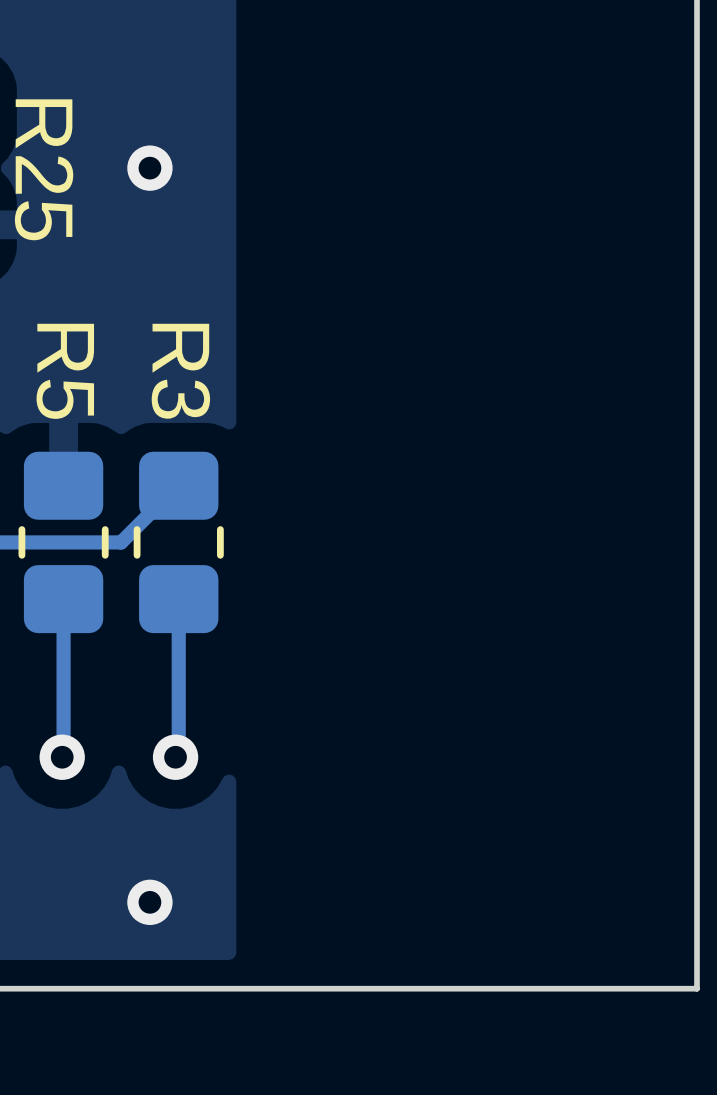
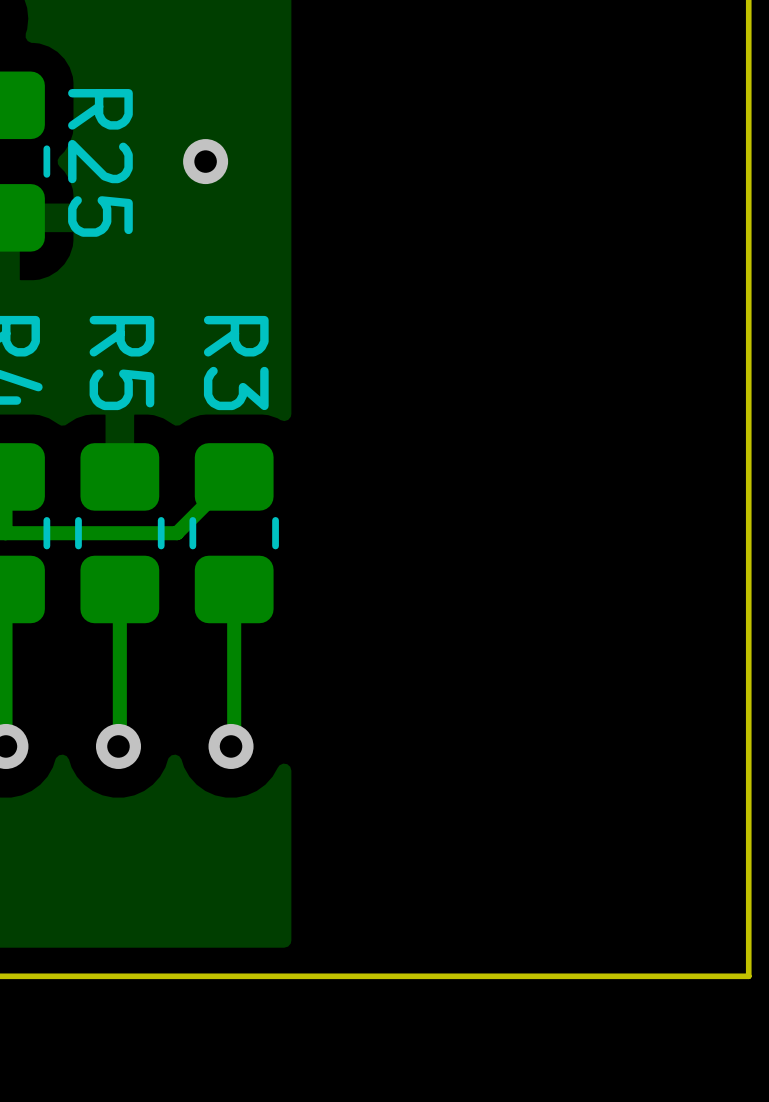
via: (149, 902) -> none

